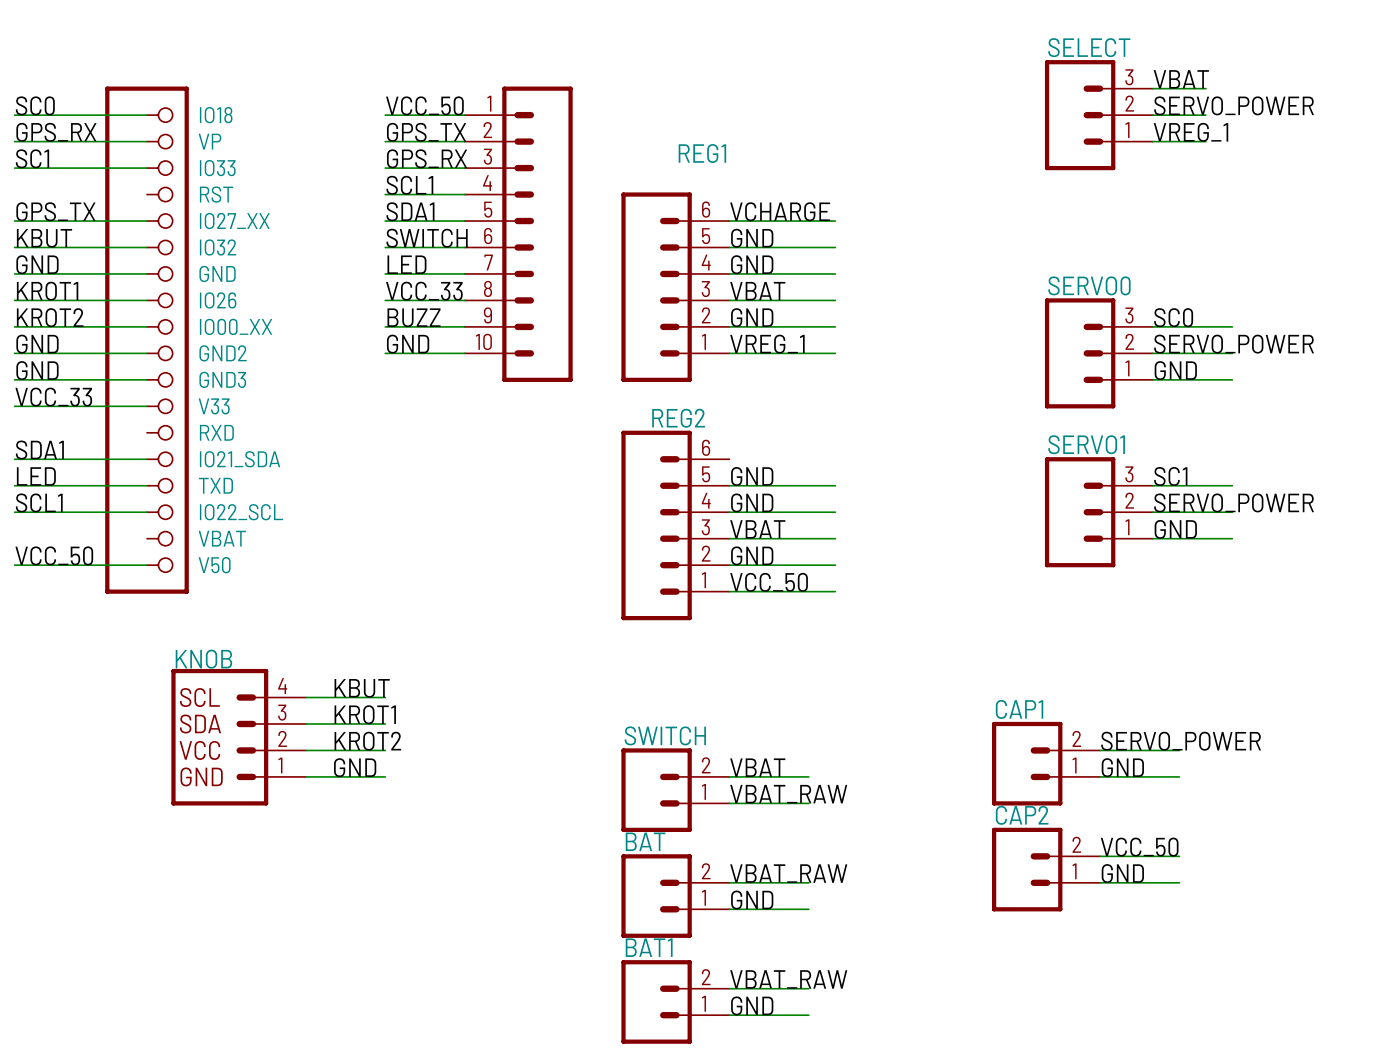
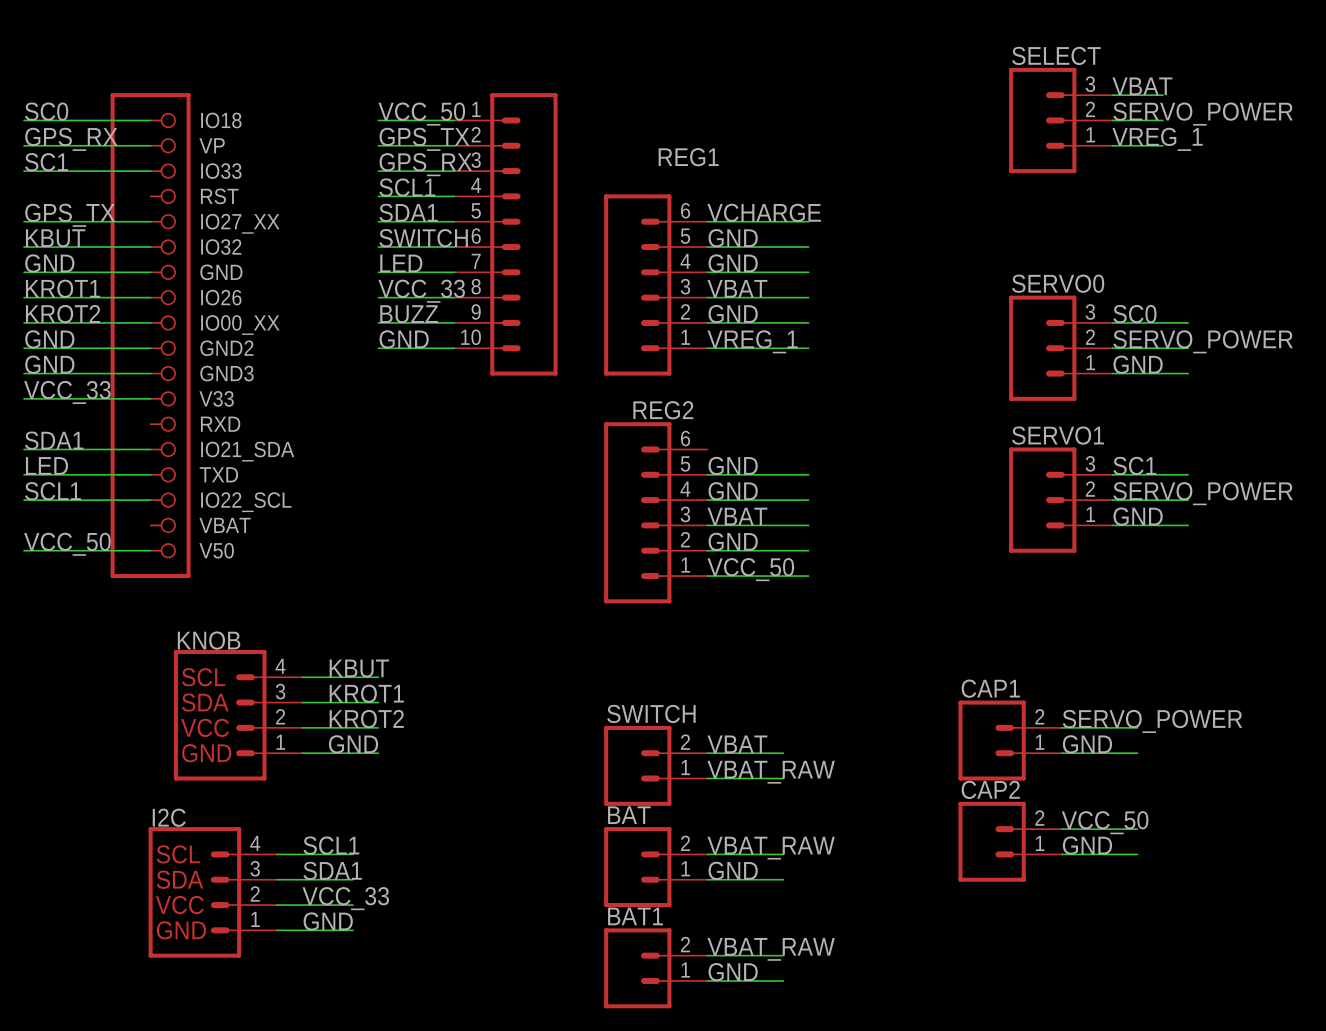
label: none -> SCL1 (331, 845)
wire: none -> (277, 854) (353, 854)
label: none -> SDA1 (332, 870)
wire: none -> (277, 879) (353, 879)
I2C: none -> (212, 892)
label: none -> VCC_33 (345, 898)
wire: none -> (277, 905) (353, 905)
label: none -> GND (328, 921)
wire: none -> (277, 930) (353, 930)

